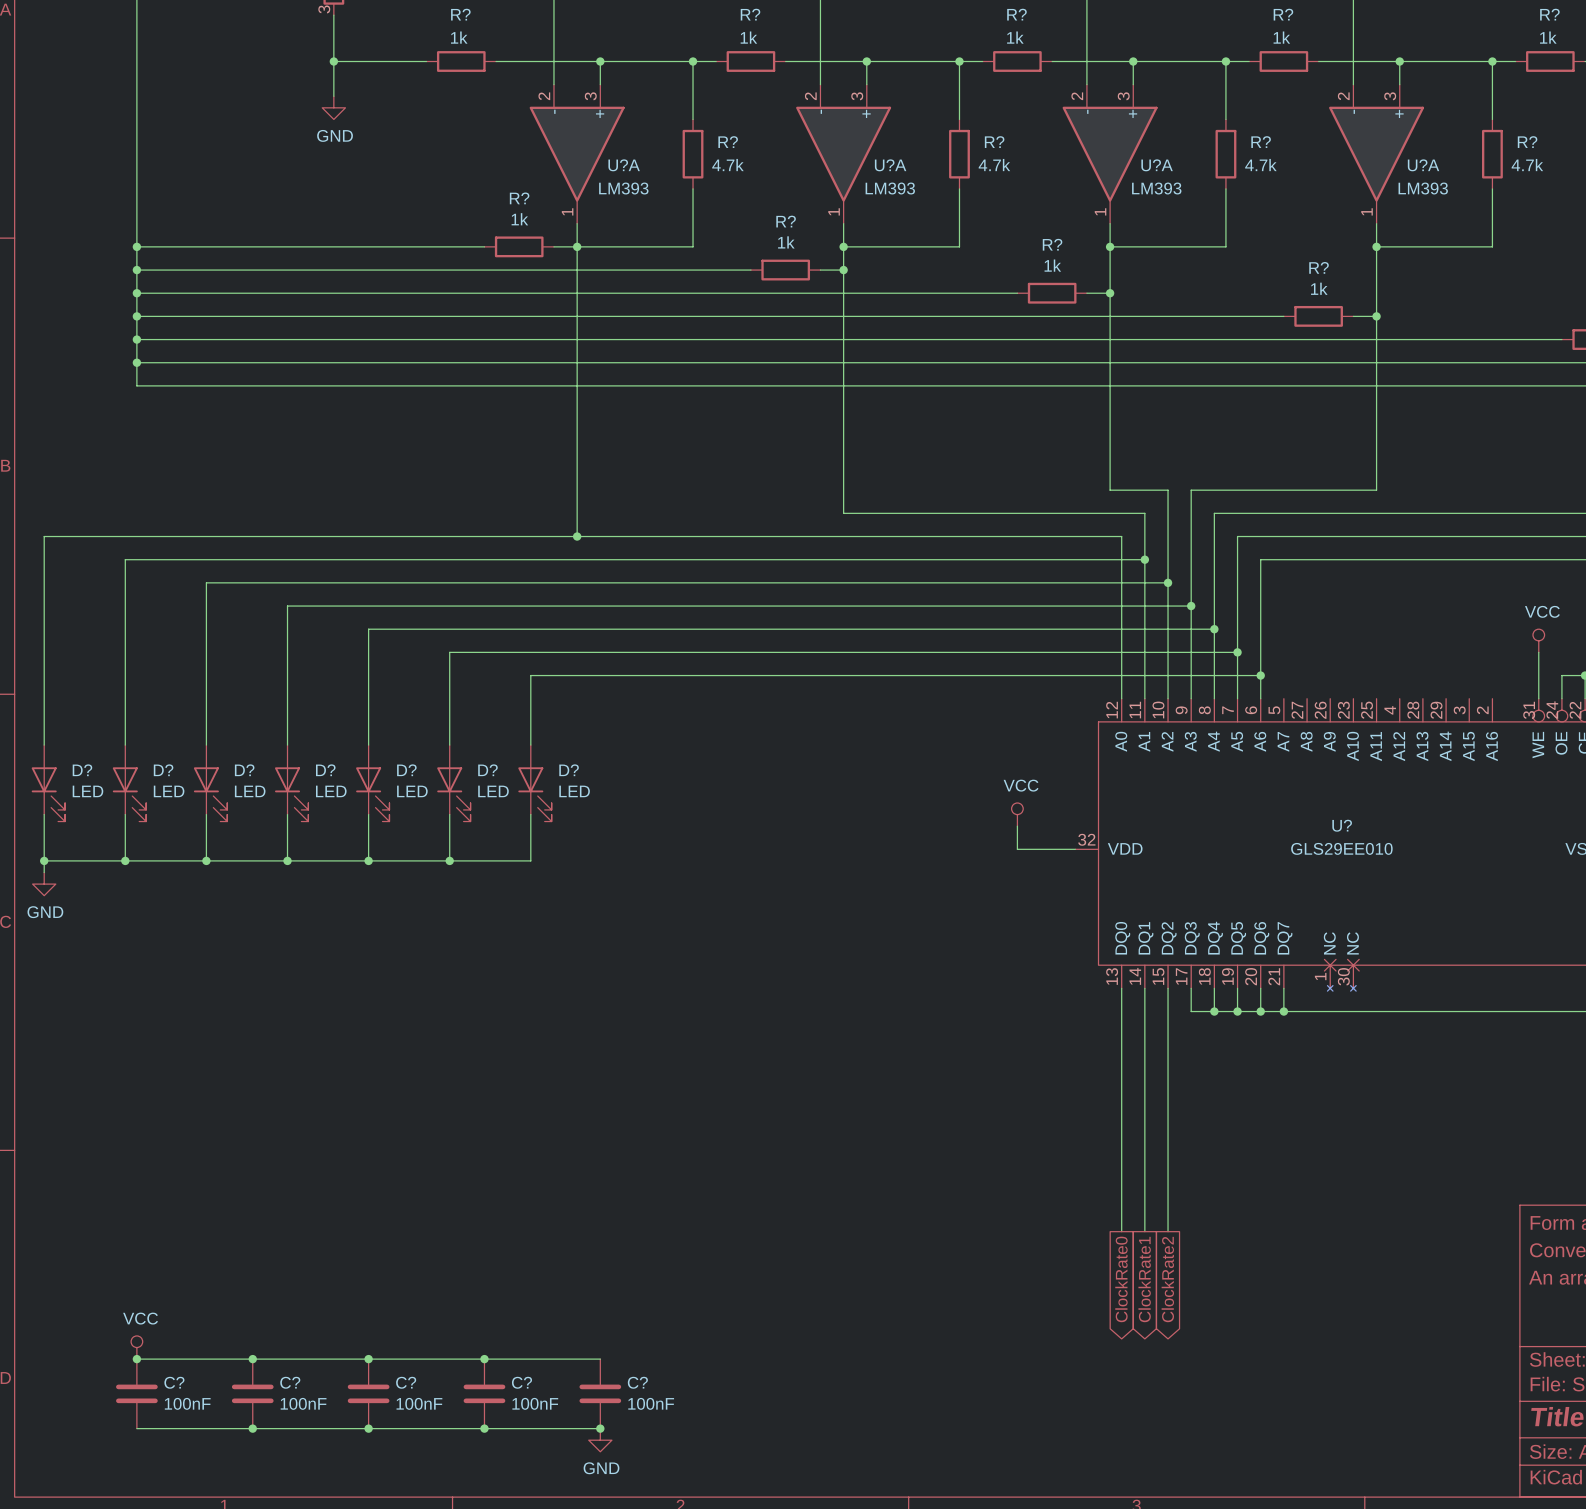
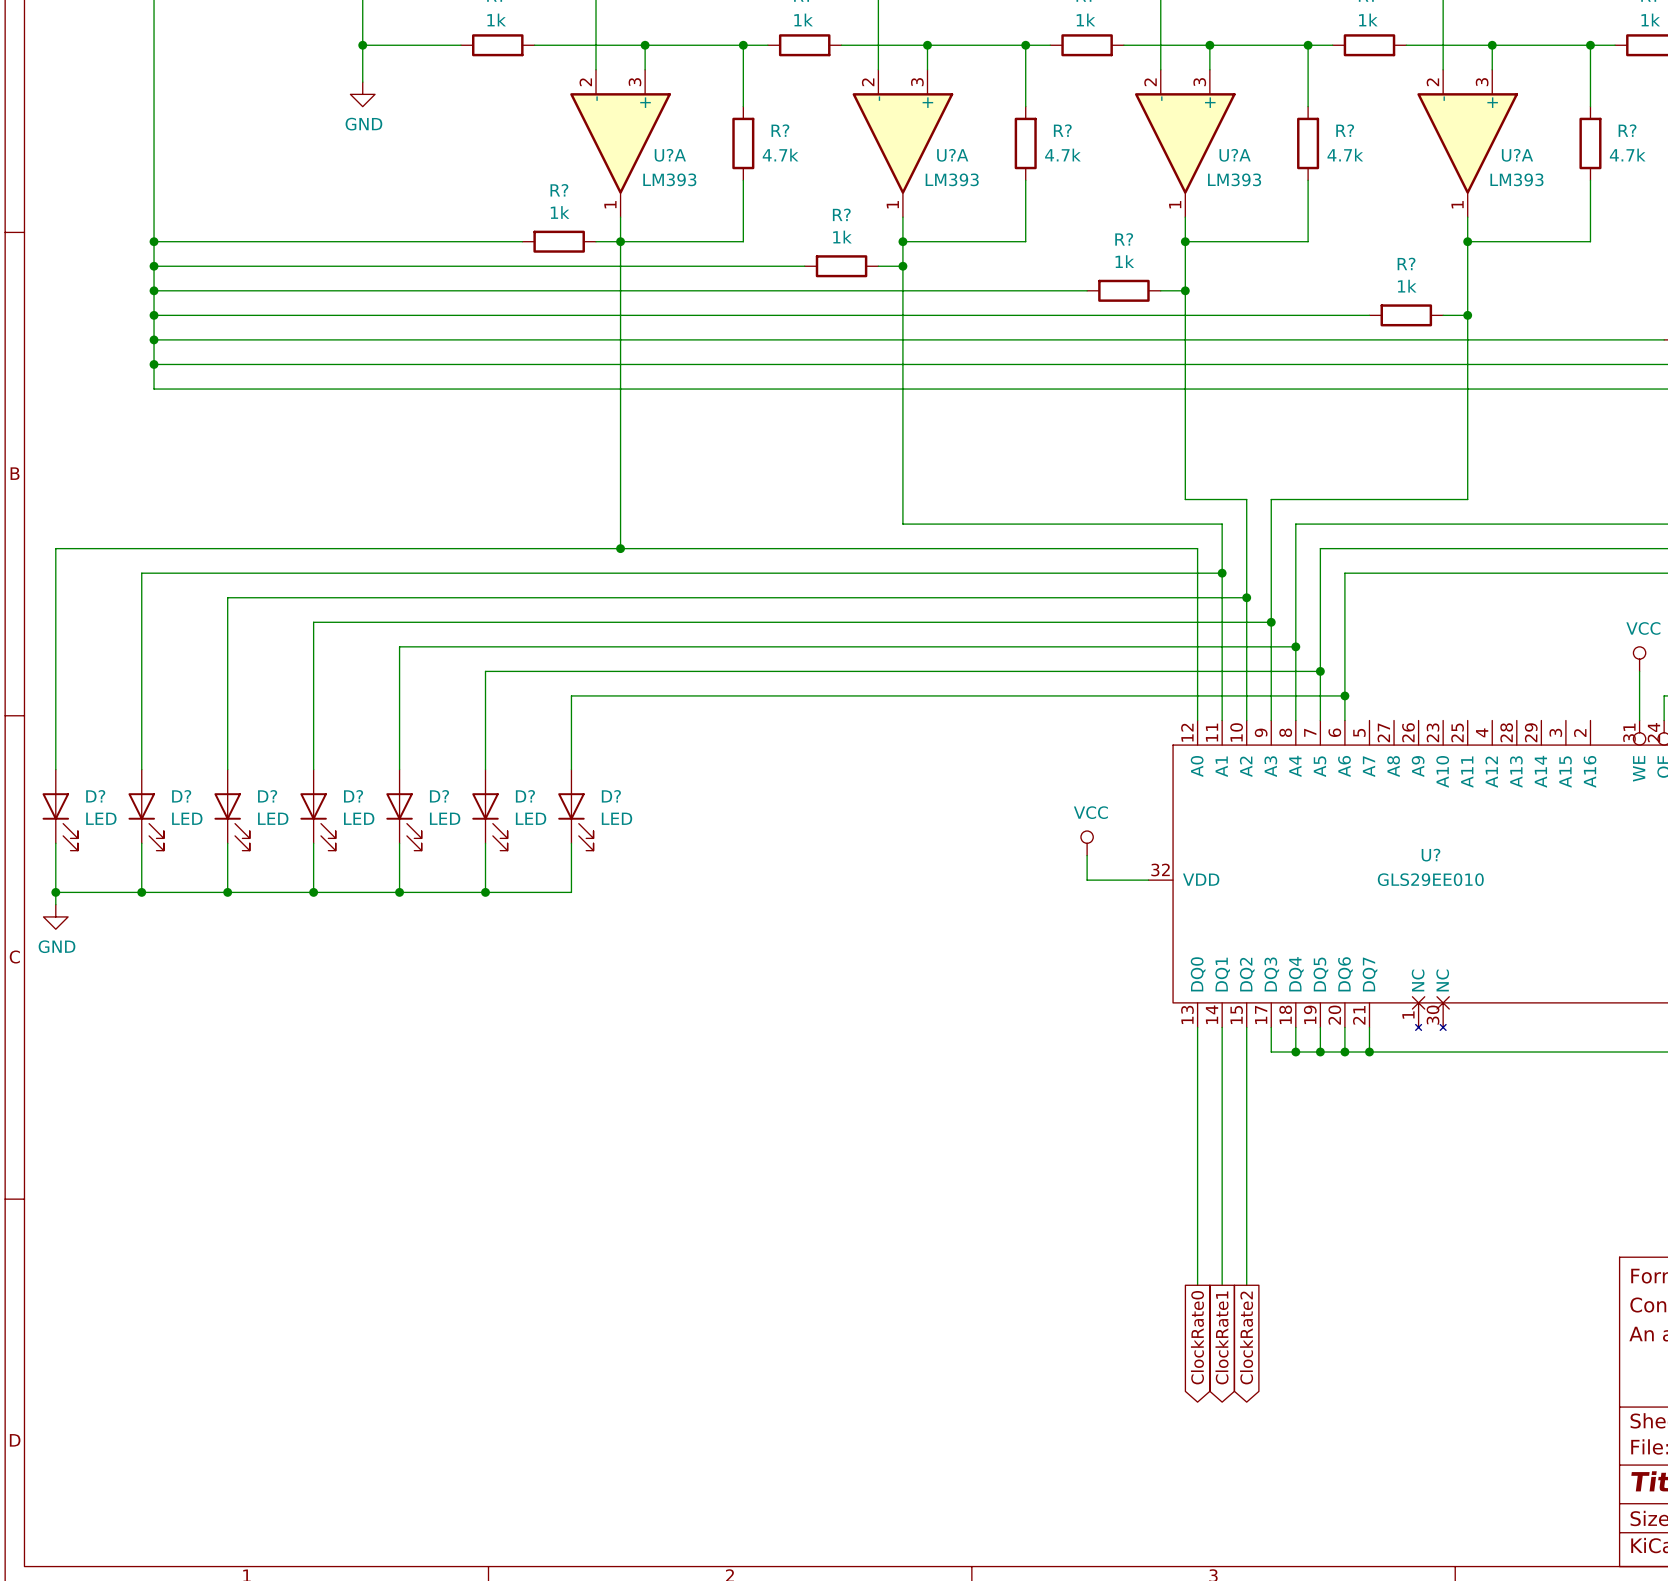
power symbol: VCC (136, 1347) -> none
wire: (136, 1359) (600, 1359) -> none
junction: (136, 1359) -> none
junction: (252, 1359) -> none
junction: (368, 1359) -> none
junction: (484, 1359) -> none
C?: 100nF (136, 1393) -> none
C?: 100nF (252, 1393) -> none
C?: 100nF (368, 1393) -> none
C?: 100nF (484, 1393) -> none
C?: 100nF (600, 1393) -> none
wire: (136, 1428) (600, 1428) -> none
junction: (252, 1428) -> none
junction: (368, 1428) -> none
junction: (484, 1428) -> none
junction: (600, 1428) -> none
power symbol: GND (600, 1440) -> none

